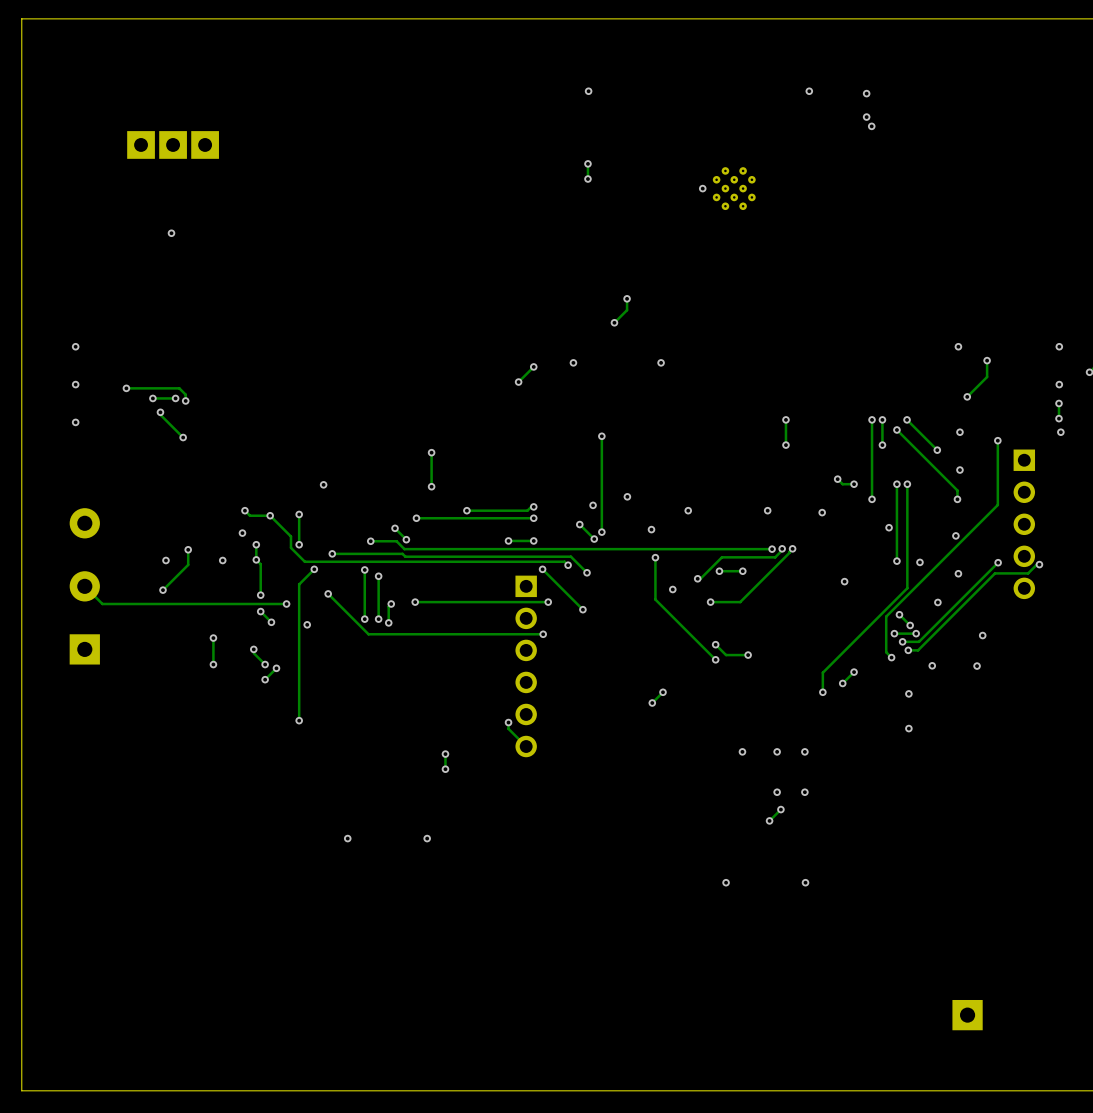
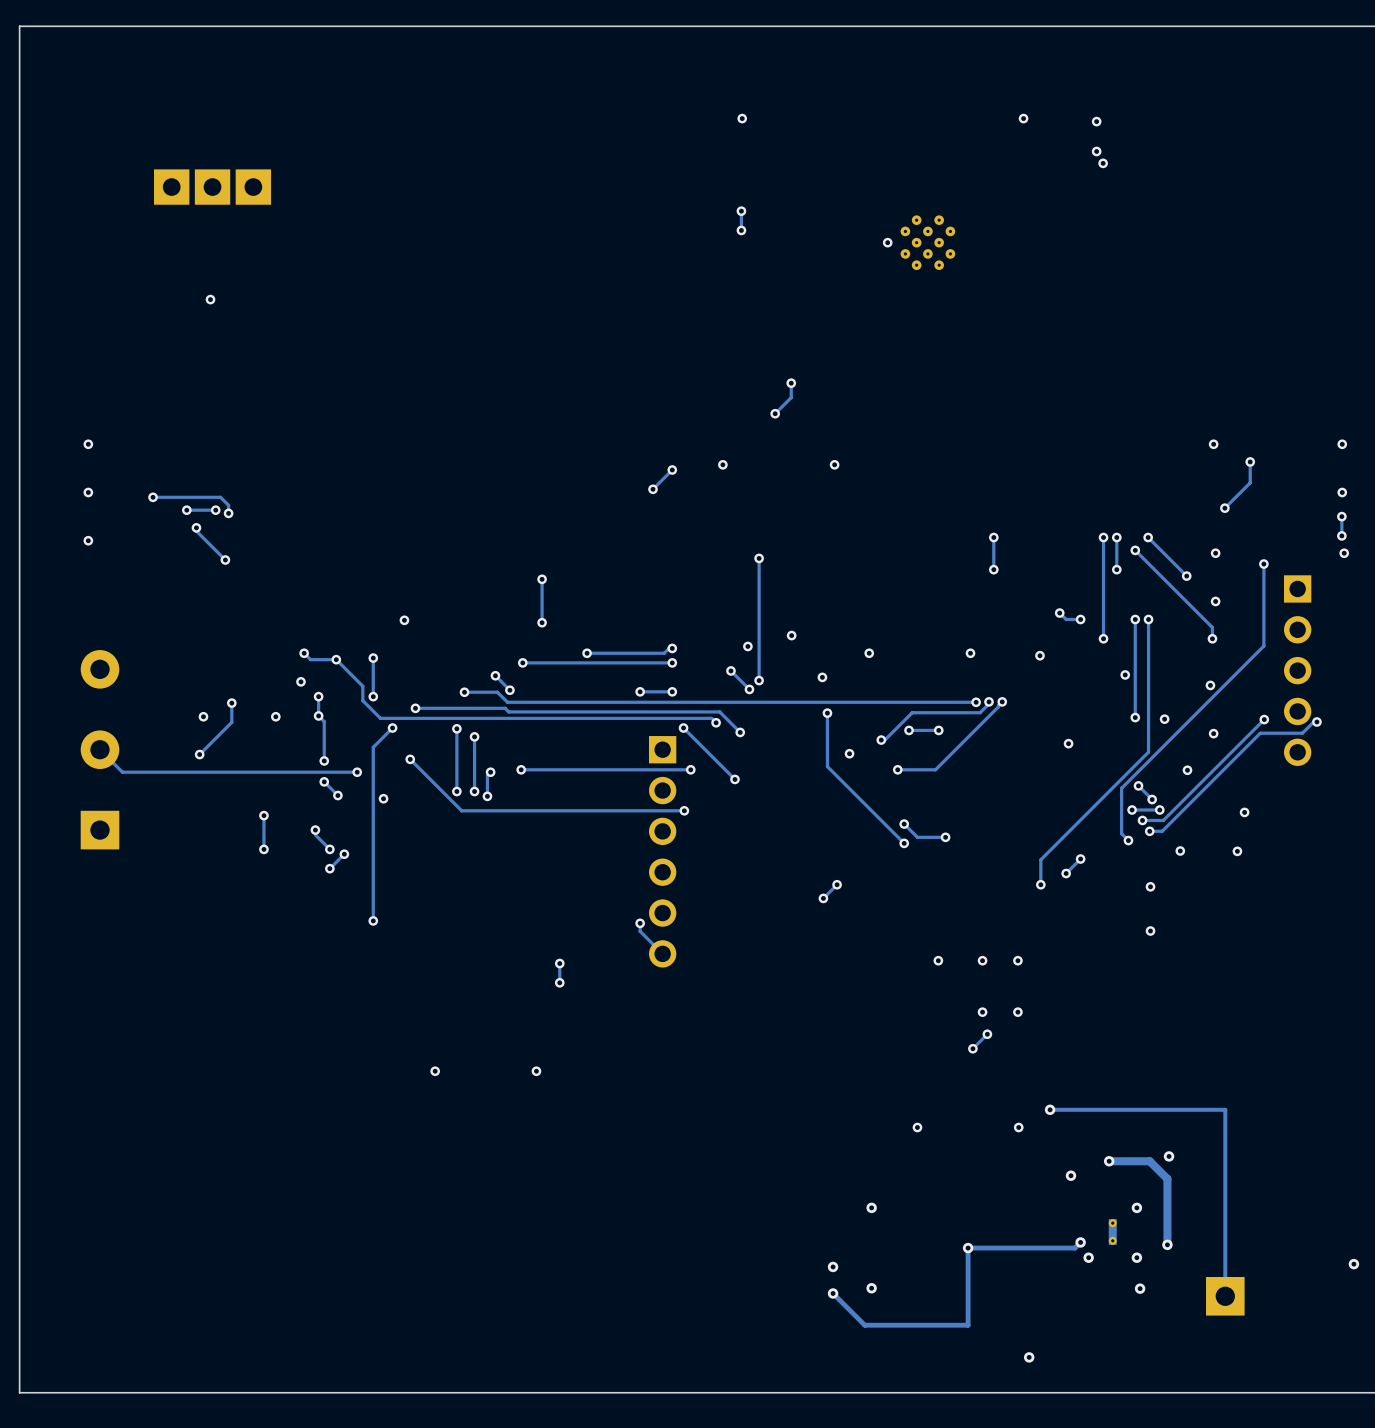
track: none -> (1050, 1109) (1225, 1109) (1225, 1296)
via: none -> (1050, 1109)
via: none -> (1169, 1156)
track: none -> (1109, 1161) (1149, 1161) (1167, 1178) (1167, 1244)
via: none -> (1109, 1161)
via: none -> (1070, 1175)
via: none -> (871, 1207)
via: none -> (1136, 1207)
part: none -> (1112, 1231)
track: none -> (1080, 1242) (1075, 1248) (968, 1248) (968, 1325) (864, 1325) (833, 1293)
via: none -> (1080, 1242)
via: none -> (1167, 1244)
via: none -> (968, 1248)
via: none -> (1088, 1257)
via: none -> (1136, 1257)
via: none -> (1353, 1264)
via: none -> (833, 1266)
via: none -> (871, 1288)
via: none -> (1140, 1288)
via: none -> (833, 1293)
via: none -> (1029, 1357)

